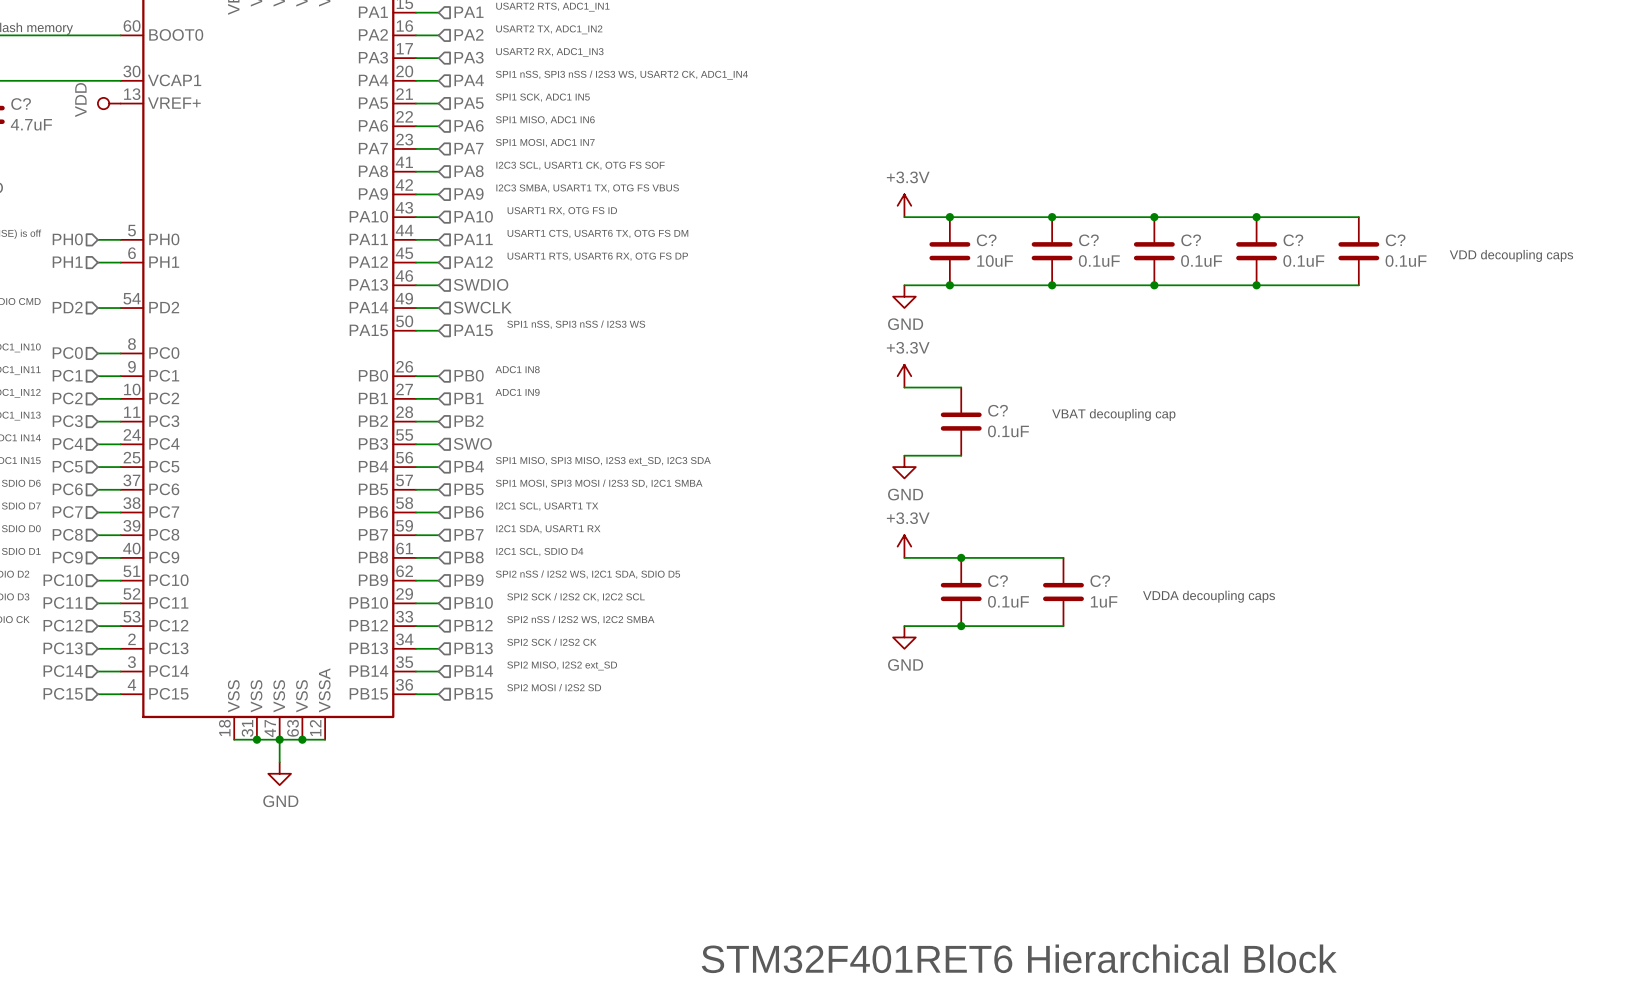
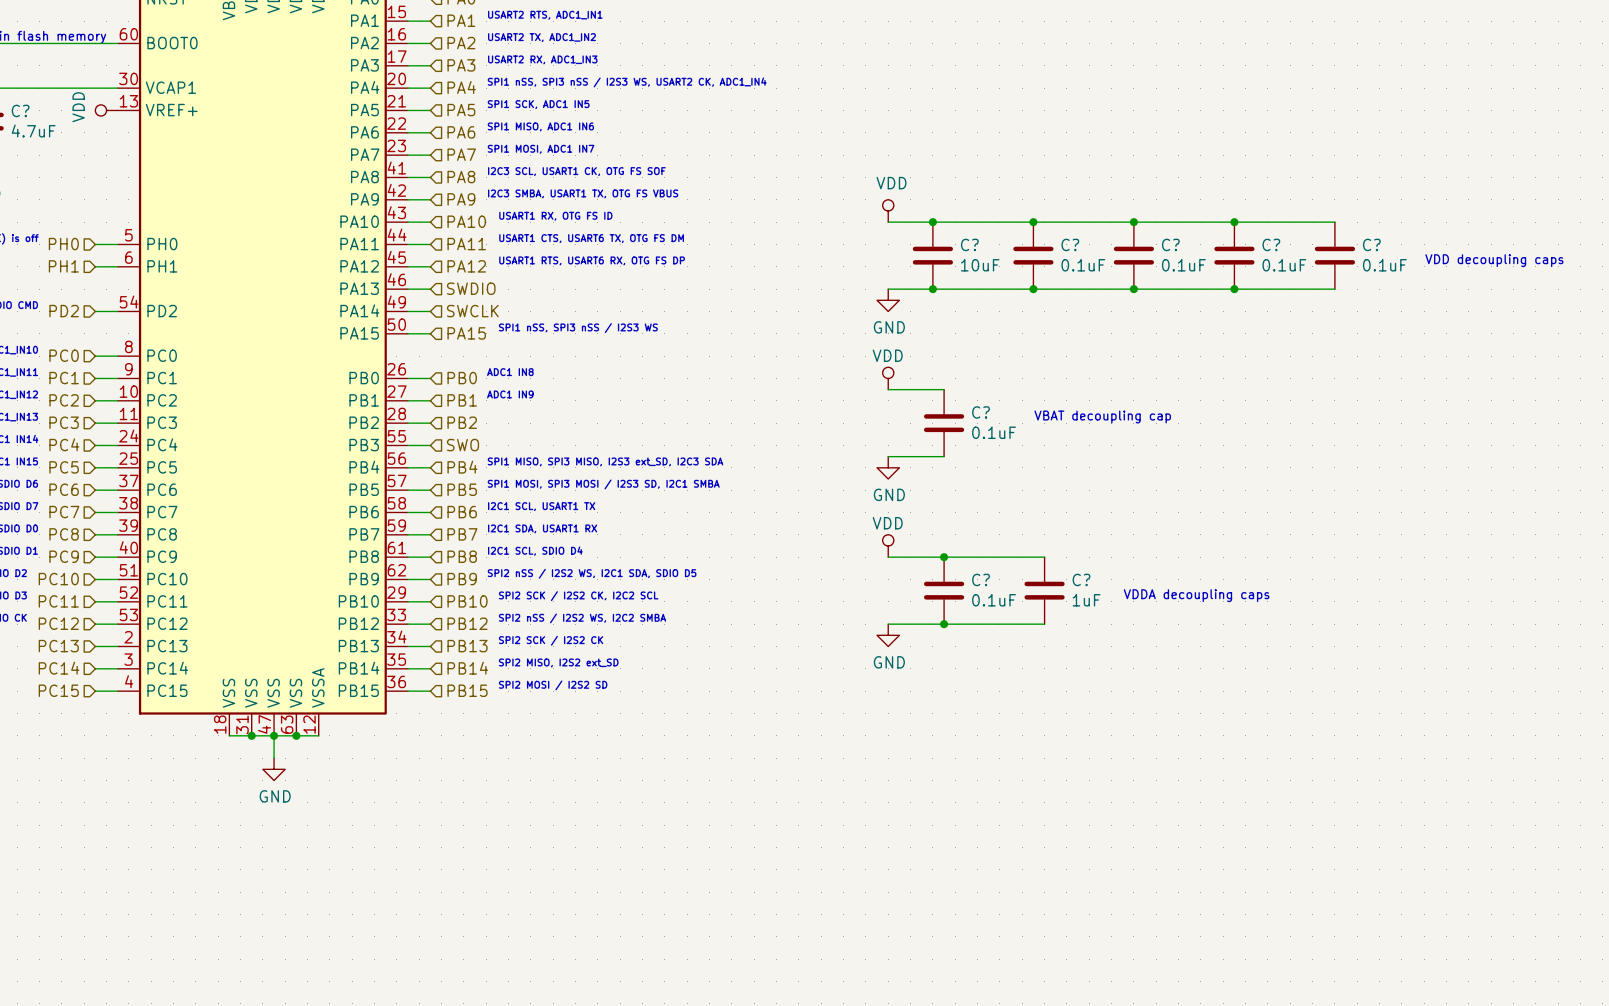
power symbol: +3.3V (904, 205) -> VDD (888, 210)
power symbol: +3.3V (904, 376) -> VDD (888, 378)
power symbol: +3.3V (904, 546) -> VDD (888, 545)
text: STM32F401RET6 Hierarchical Block (1019, 958) -> none

